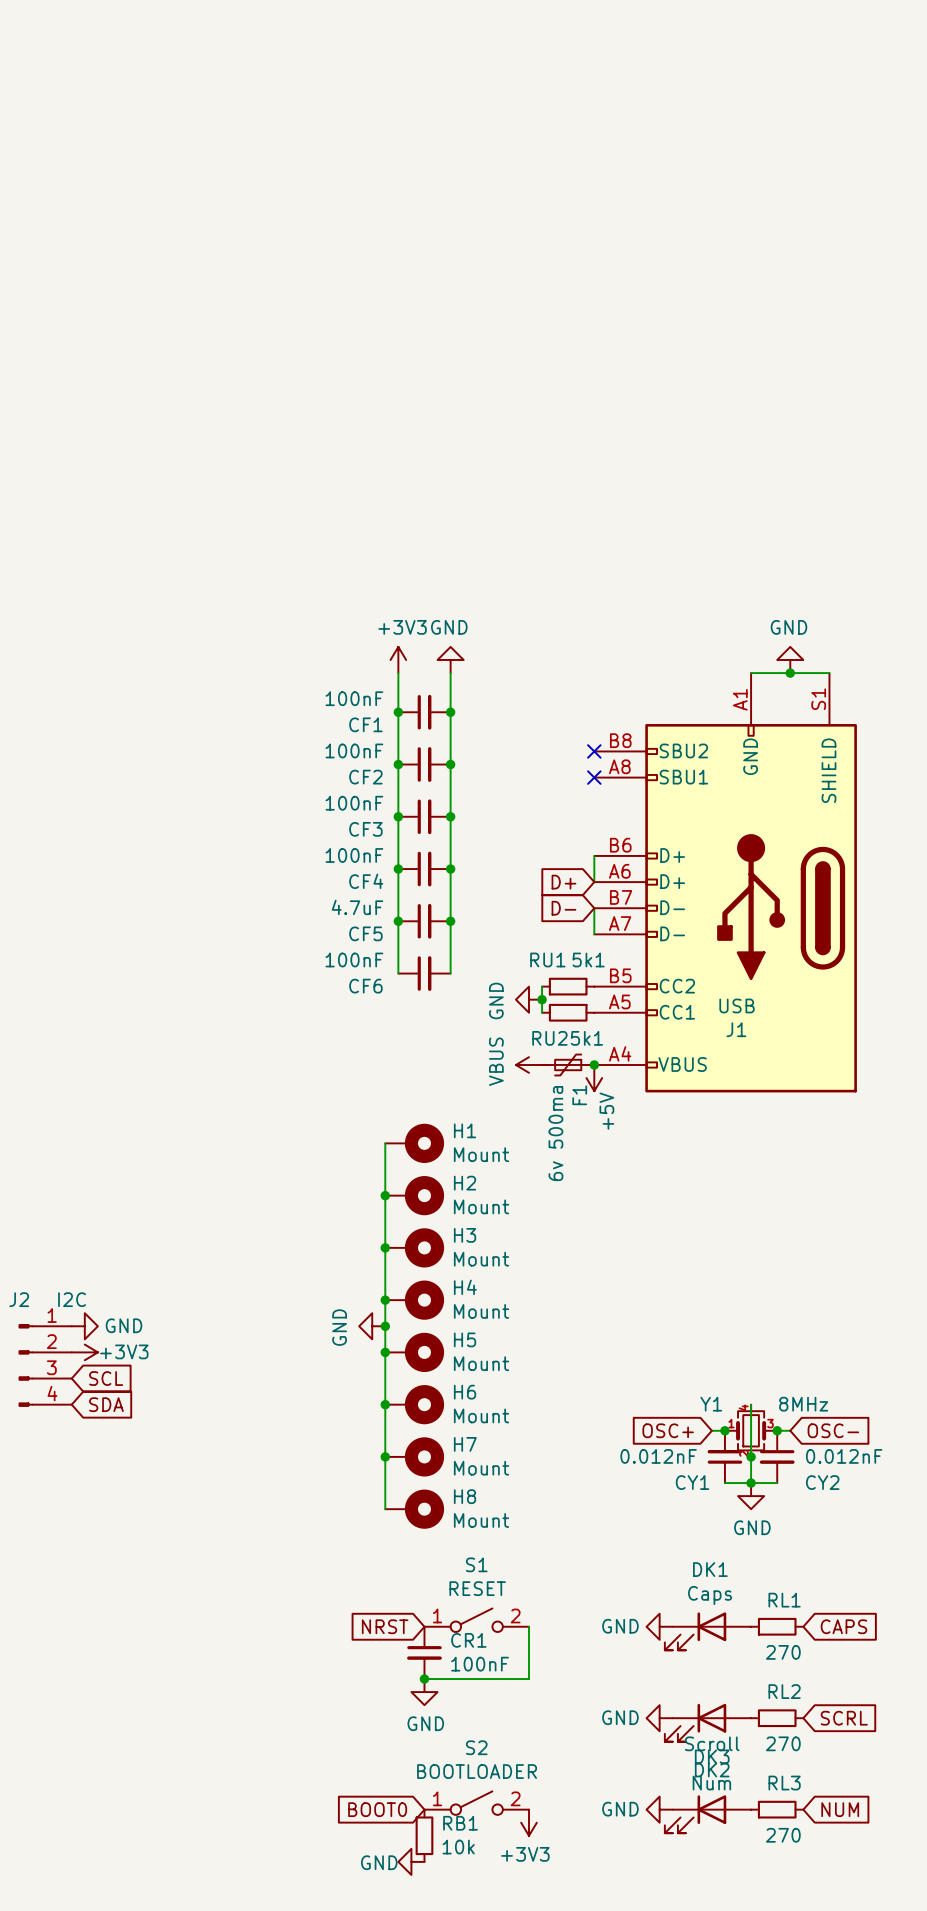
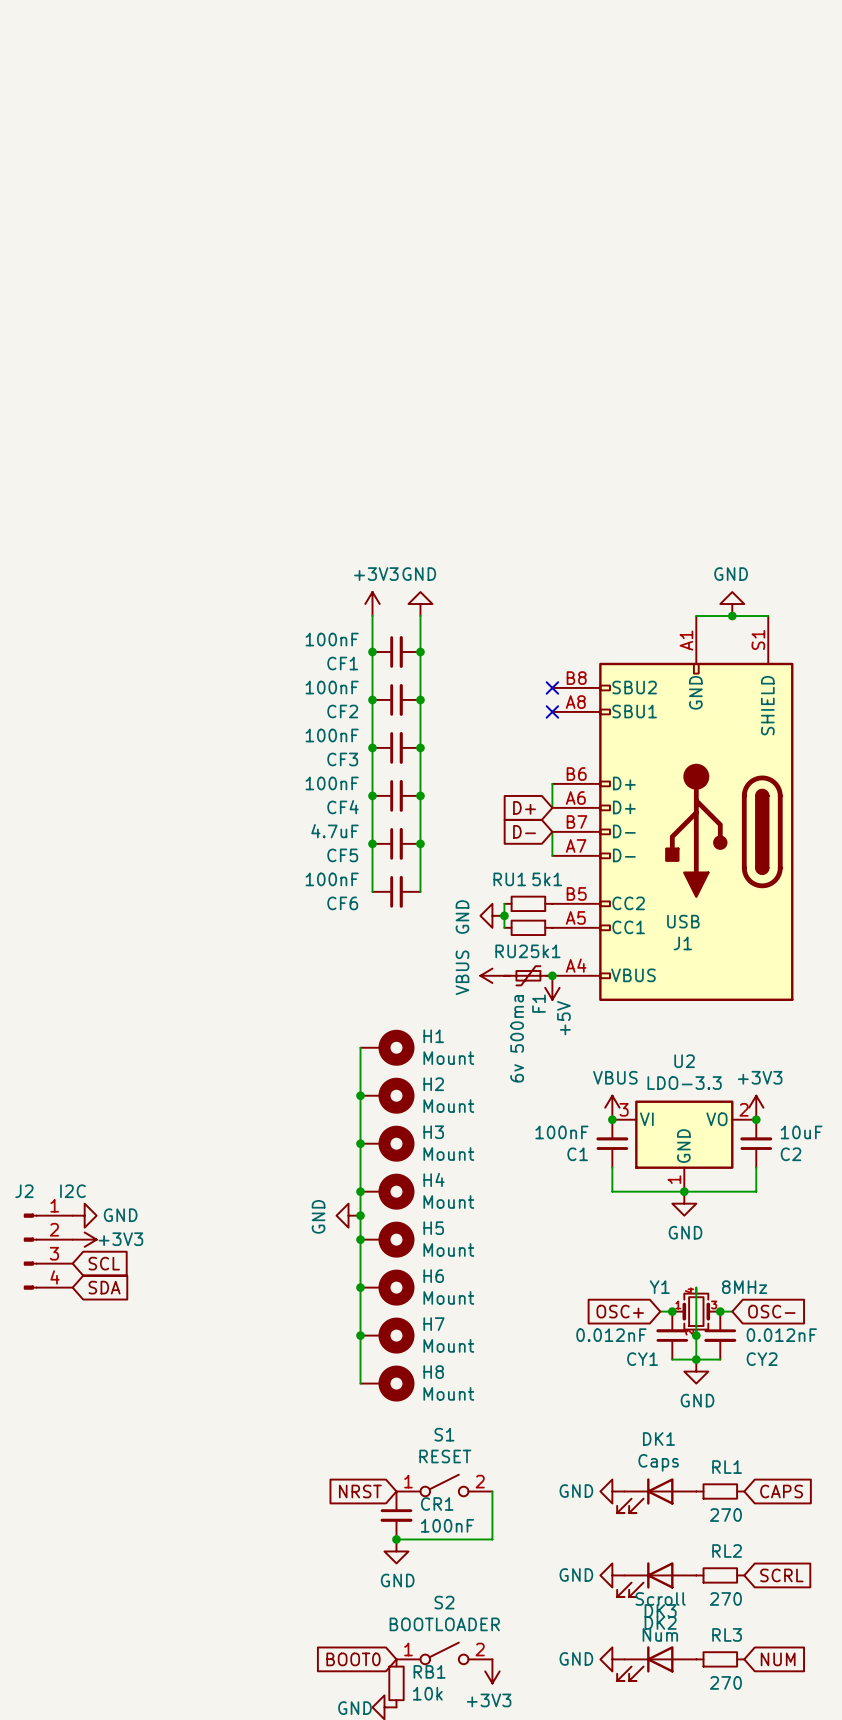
power symbol: none -> VBUS (612, 1107)
power symbol: none -> +3V3 (756, 1107)
junction: none -> (612, 1119)
junction: none -> (756, 1119)
C1: none -> 100nF (612, 1143)
C2: none -> 10uF (756, 1143)
U2: none -> LDO-3.3 (684, 1146)
wire: none -> (612, 1167) (612, 1191) (756, 1191) (756, 1167)
junction: none -> (684, 1191)
power symbol: none -> GND (684, 1203)

